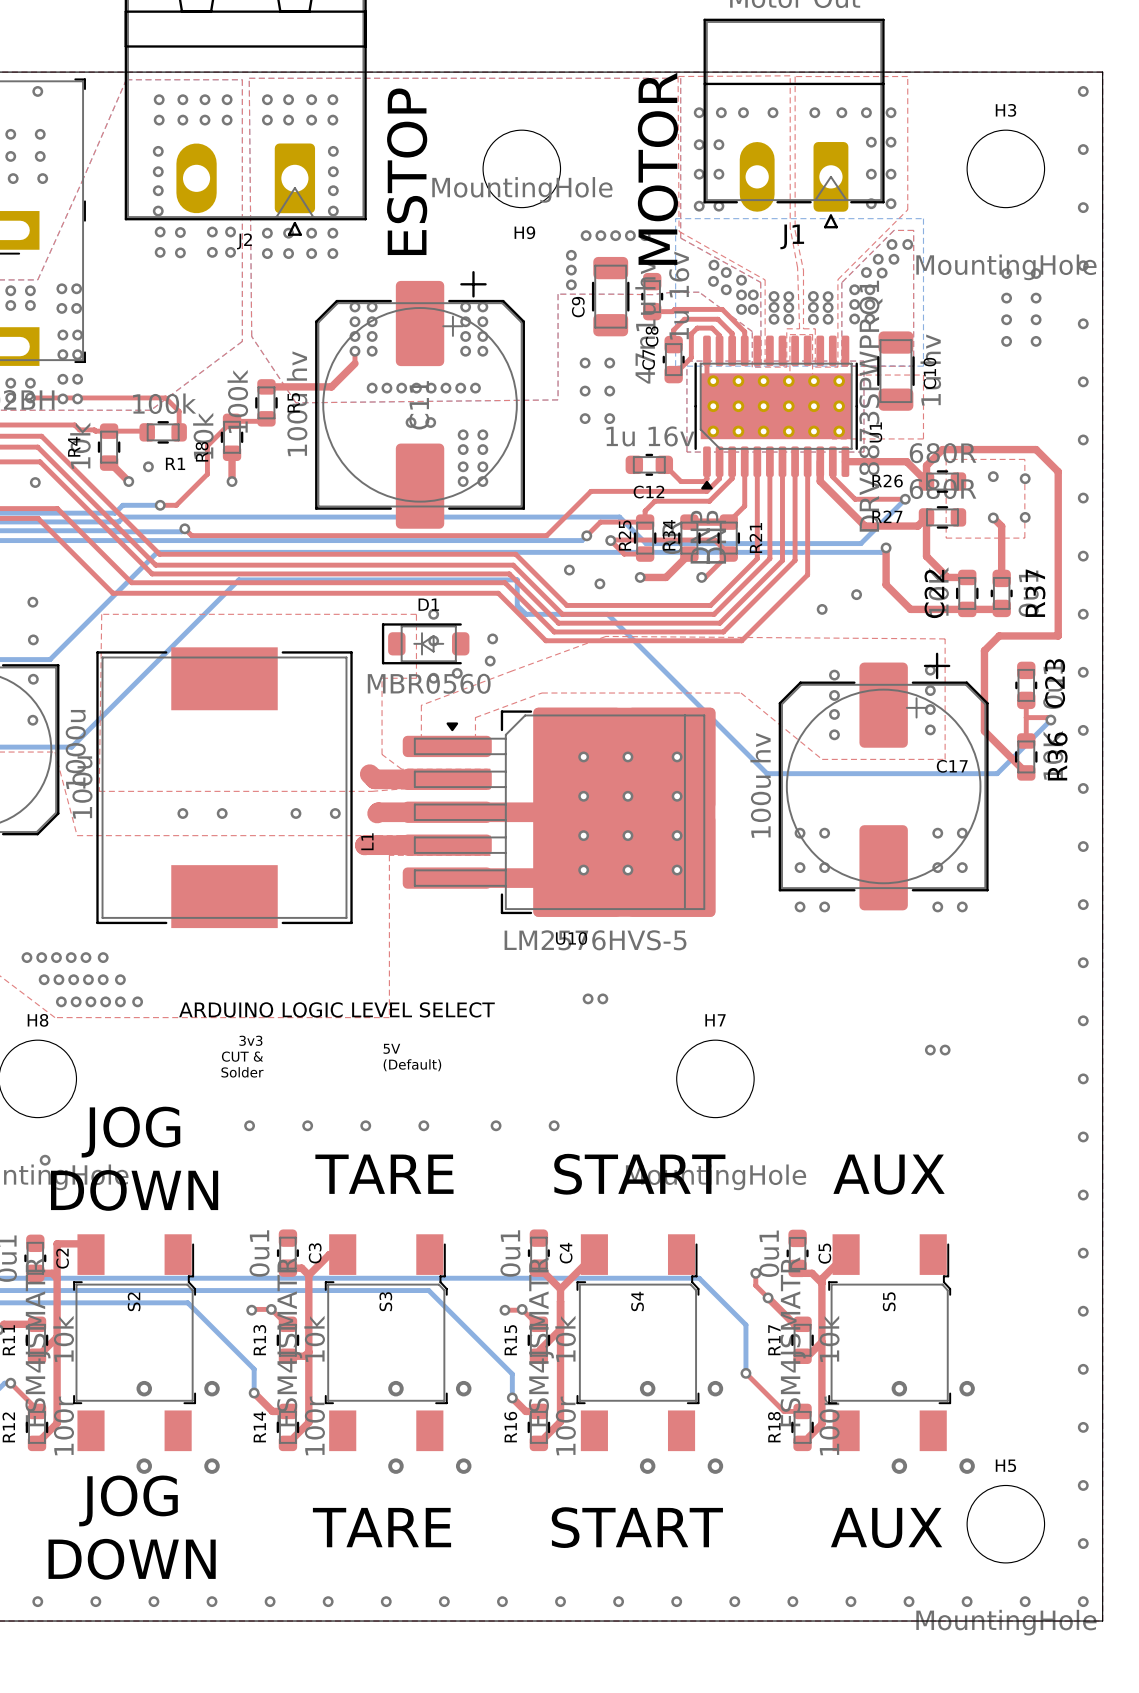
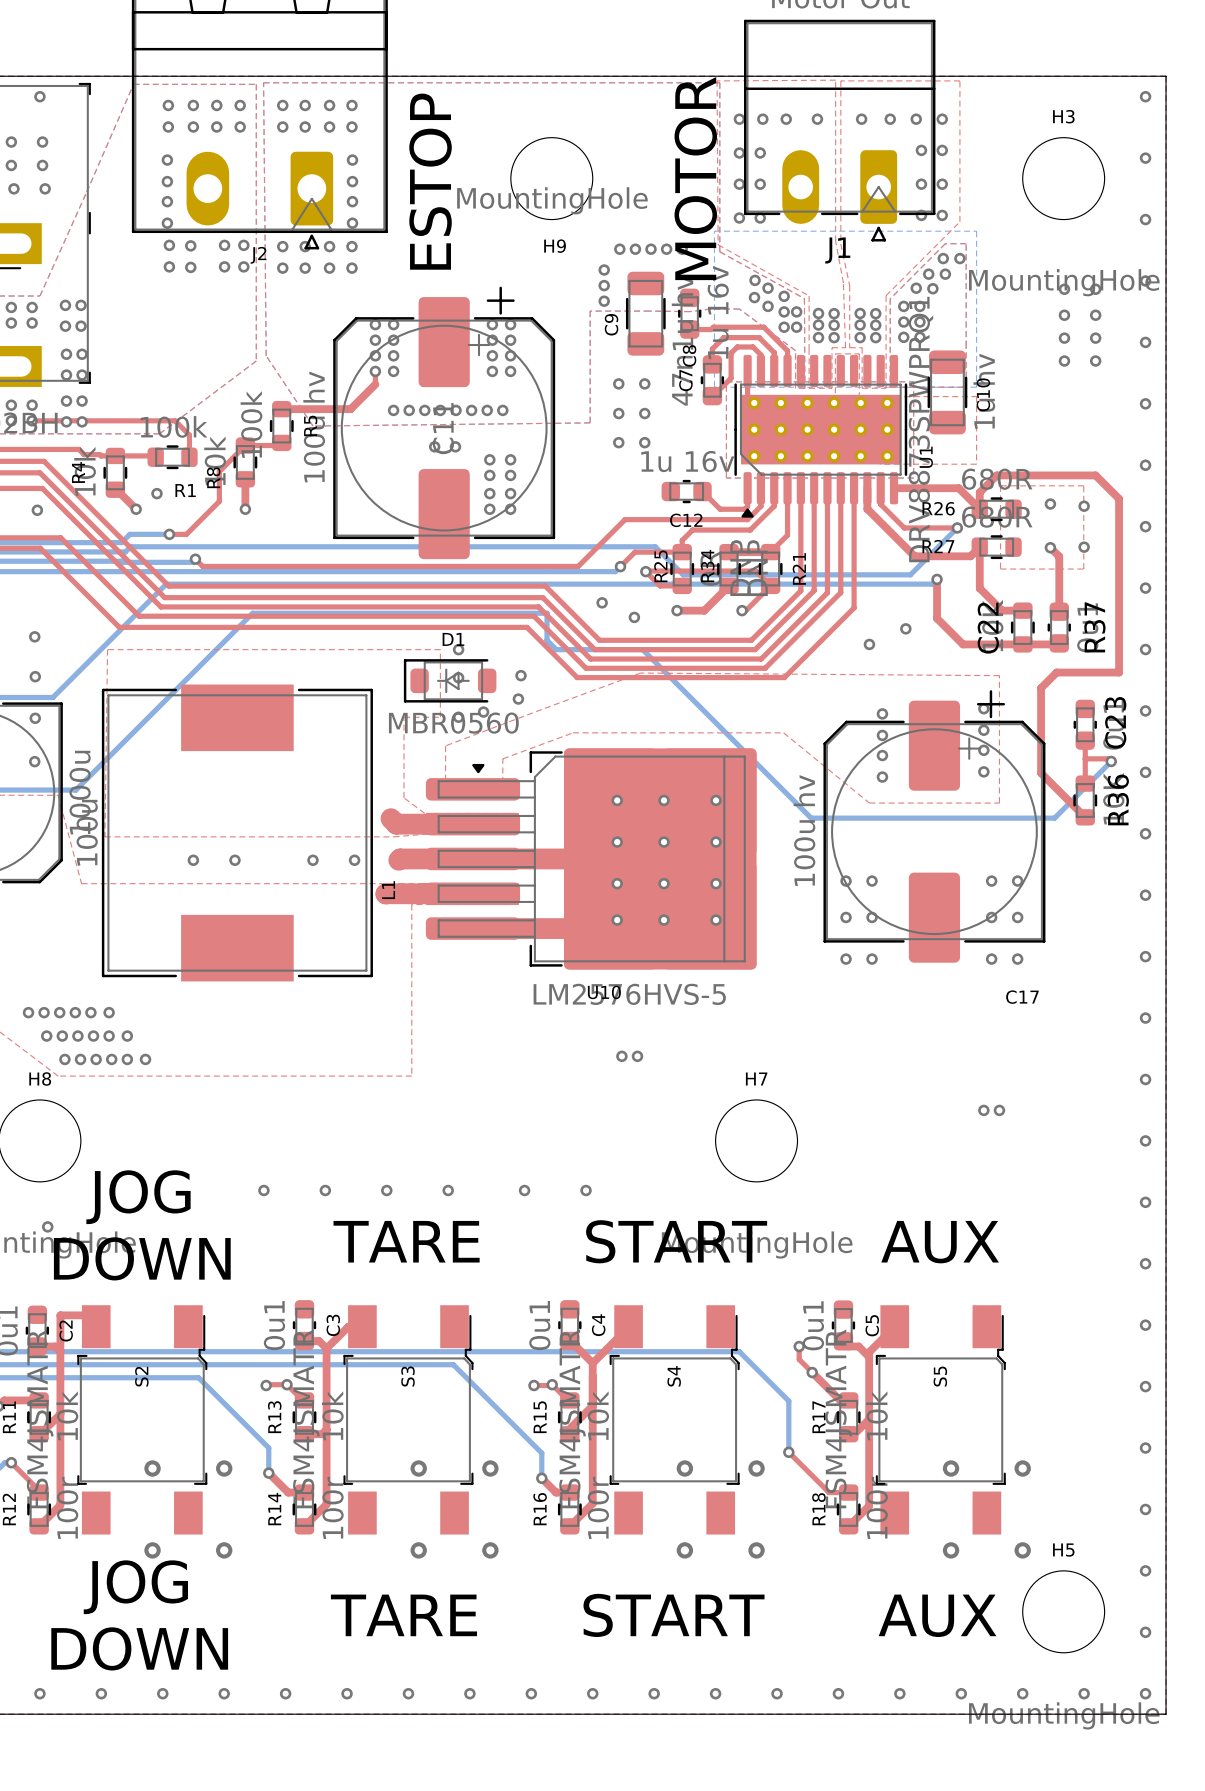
C17 name position: C17 (952, 766) -> C17 (1022, 997)
text: ARDUINO LOGIC LEVEL SELECT (336, 1009) -> none
text: 3v3 (250, 1040) -> none
text: 5V (391, 1048) -> none
text: CUT & (242, 1056) -> none
text: (Default) (412, 1065) -> none
text: Solder (242, 1072) -> none

